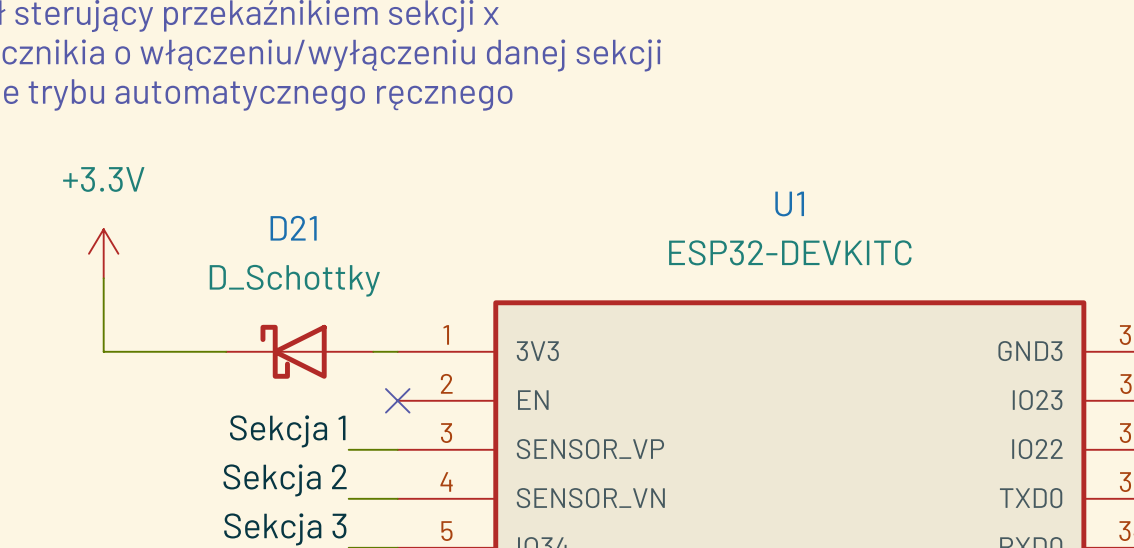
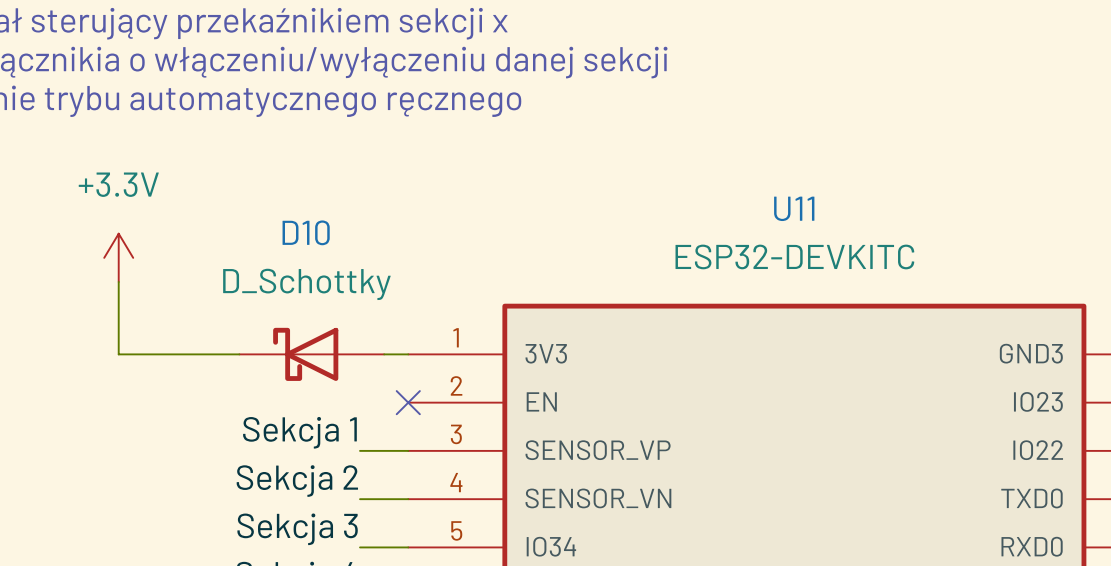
U1 name: U1 (789, 203) -> U11 (794, 208)
D21 name: D21 (293, 228) -> D10 (306, 232)

